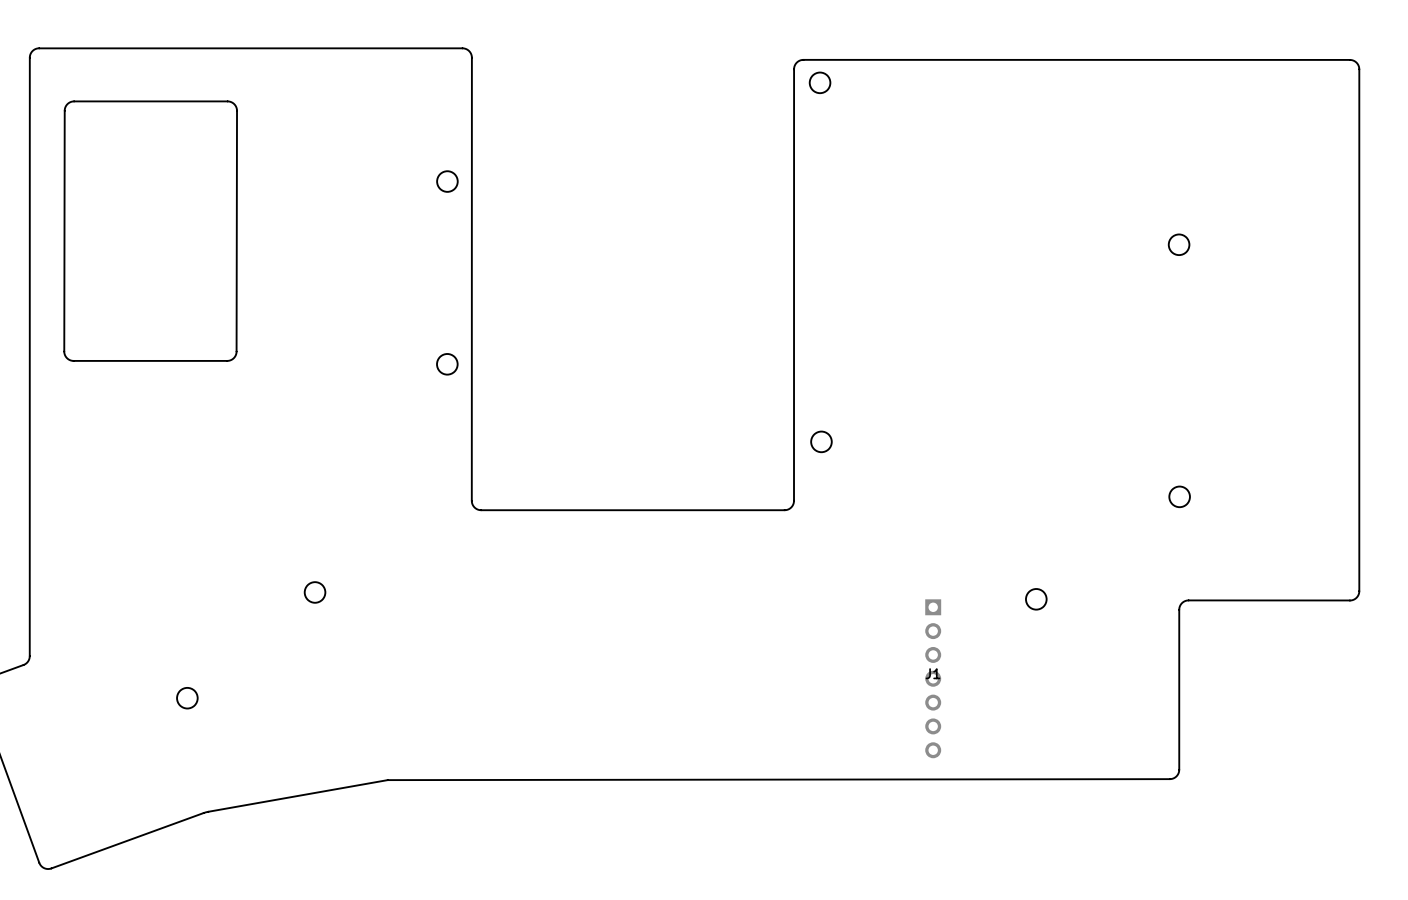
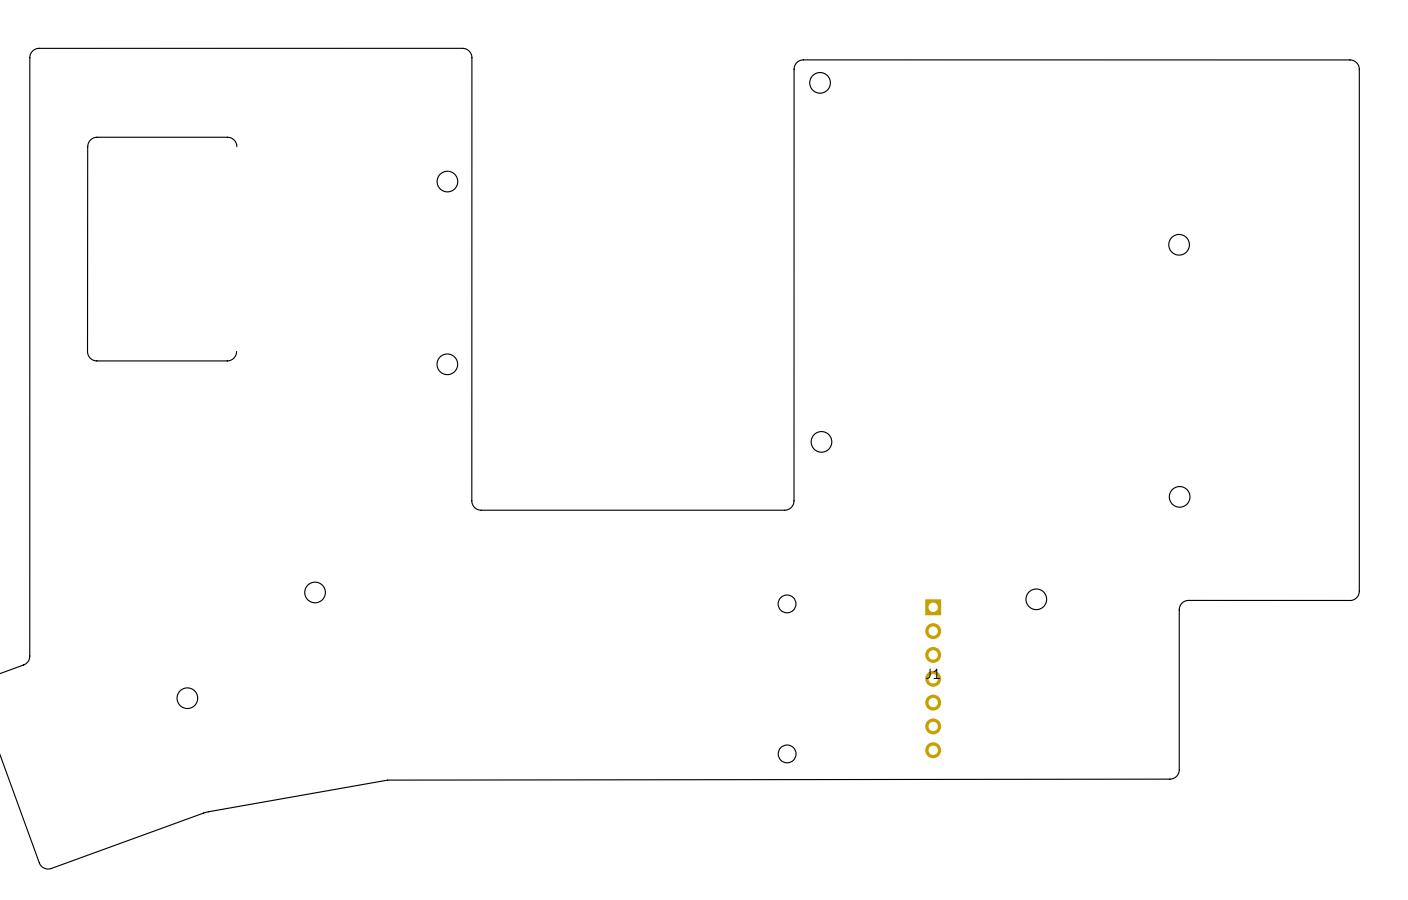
board edge: none -> (87, 146) (90, 139) (97, 137) (228, 137) (234, 139) (236, 146)
board edge: (236, 351) (235, 105) (227, 101) (73, 101) (66, 104) (64, 110) (64, 352) (67, 358) (71, 360) (96, 360) -> (87, 146) (87, 351) (90, 358) (96, 360)
drawing: none -> [778, 594, 796, 613]
drawing: none -> [778, 744, 797, 763]

